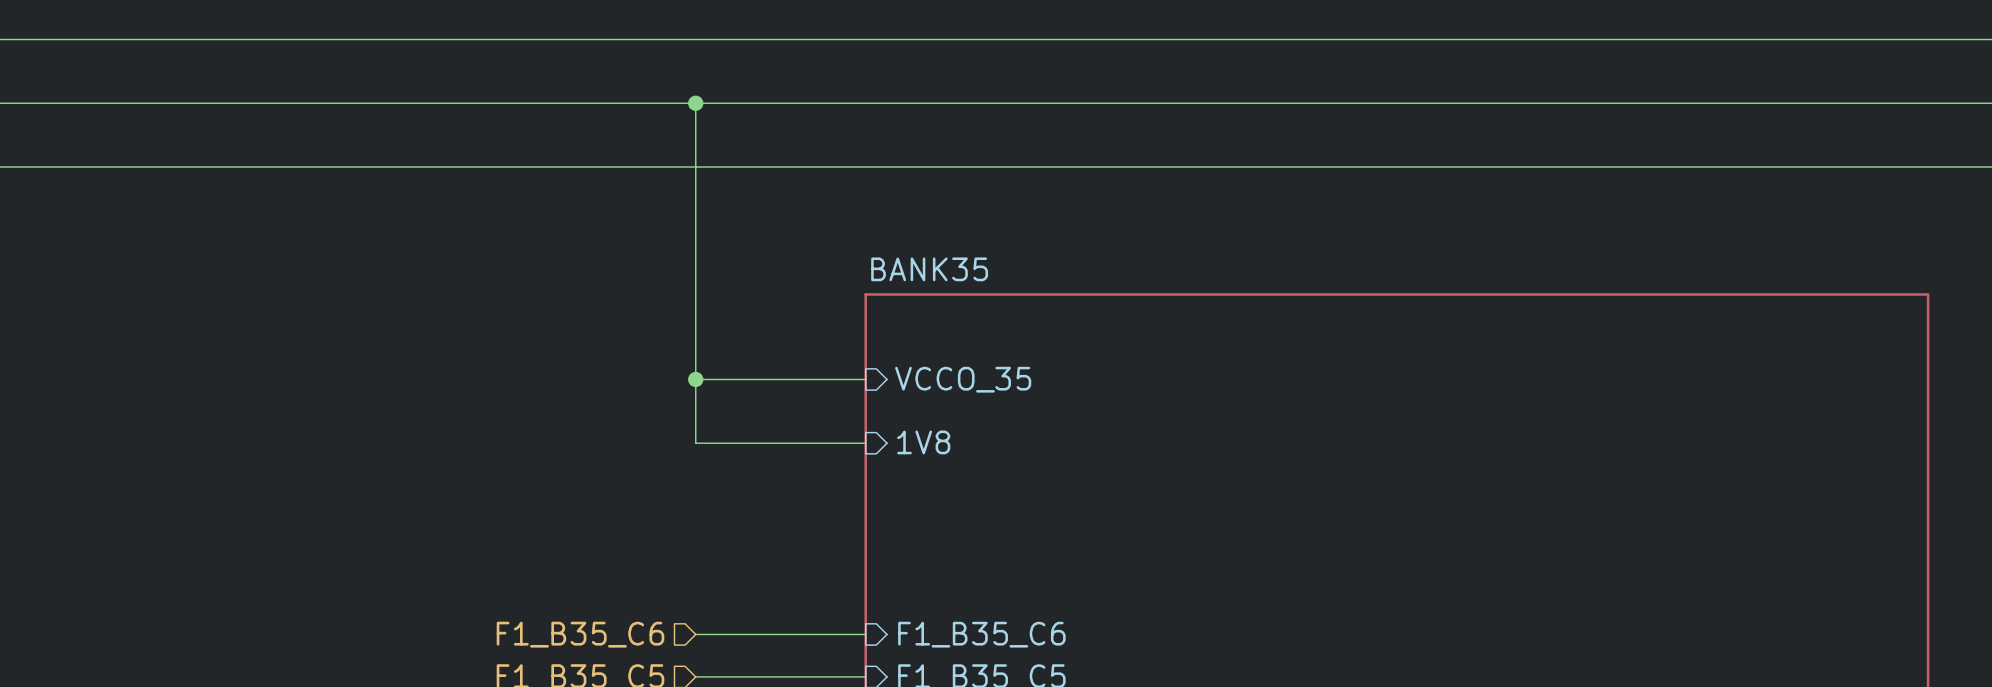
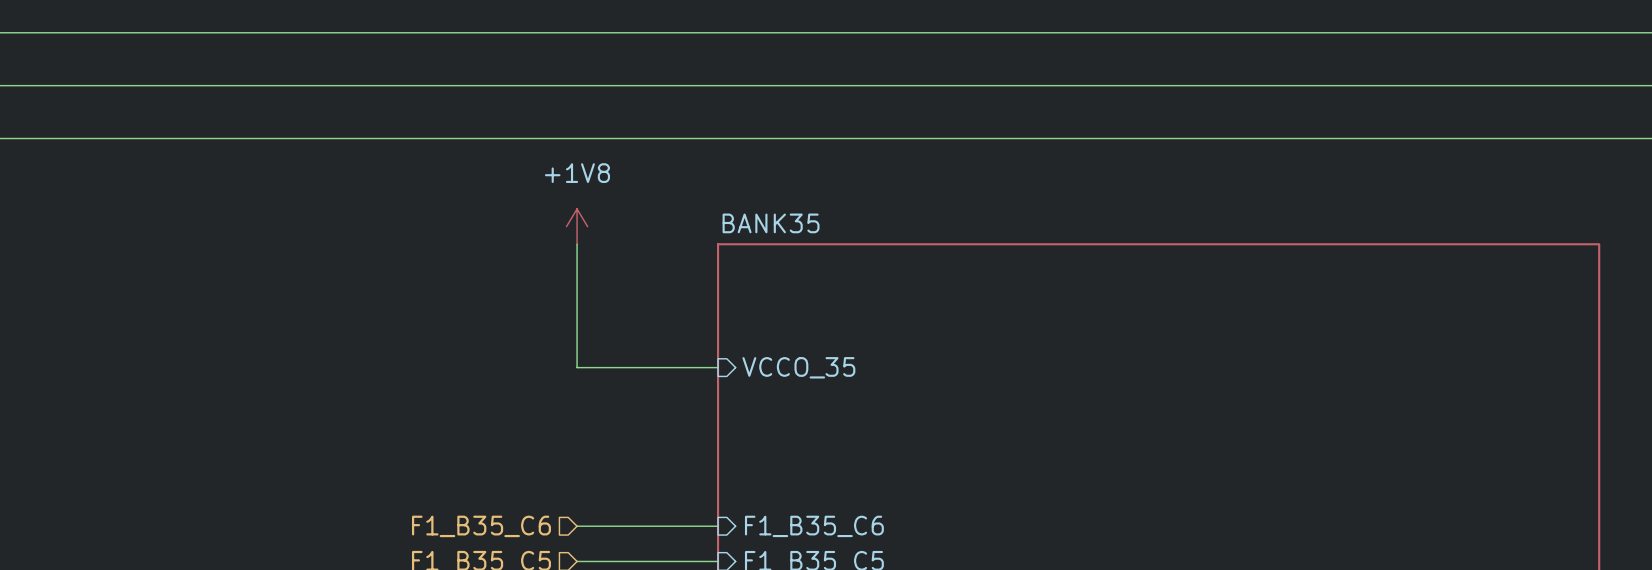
wire: (695, 103) (695, 294) -> none
junction: (695, 103) -> none
power symbol: none -> +1V8 (577, 226)
wire: (695, 379) (865, 379) -> none
junction: (695, 379) -> none
sheet pin: VCCO_35 (963, 379) -> none
sheet pin: 1V8 (923, 442) -> VCCO_35 (798, 367)

